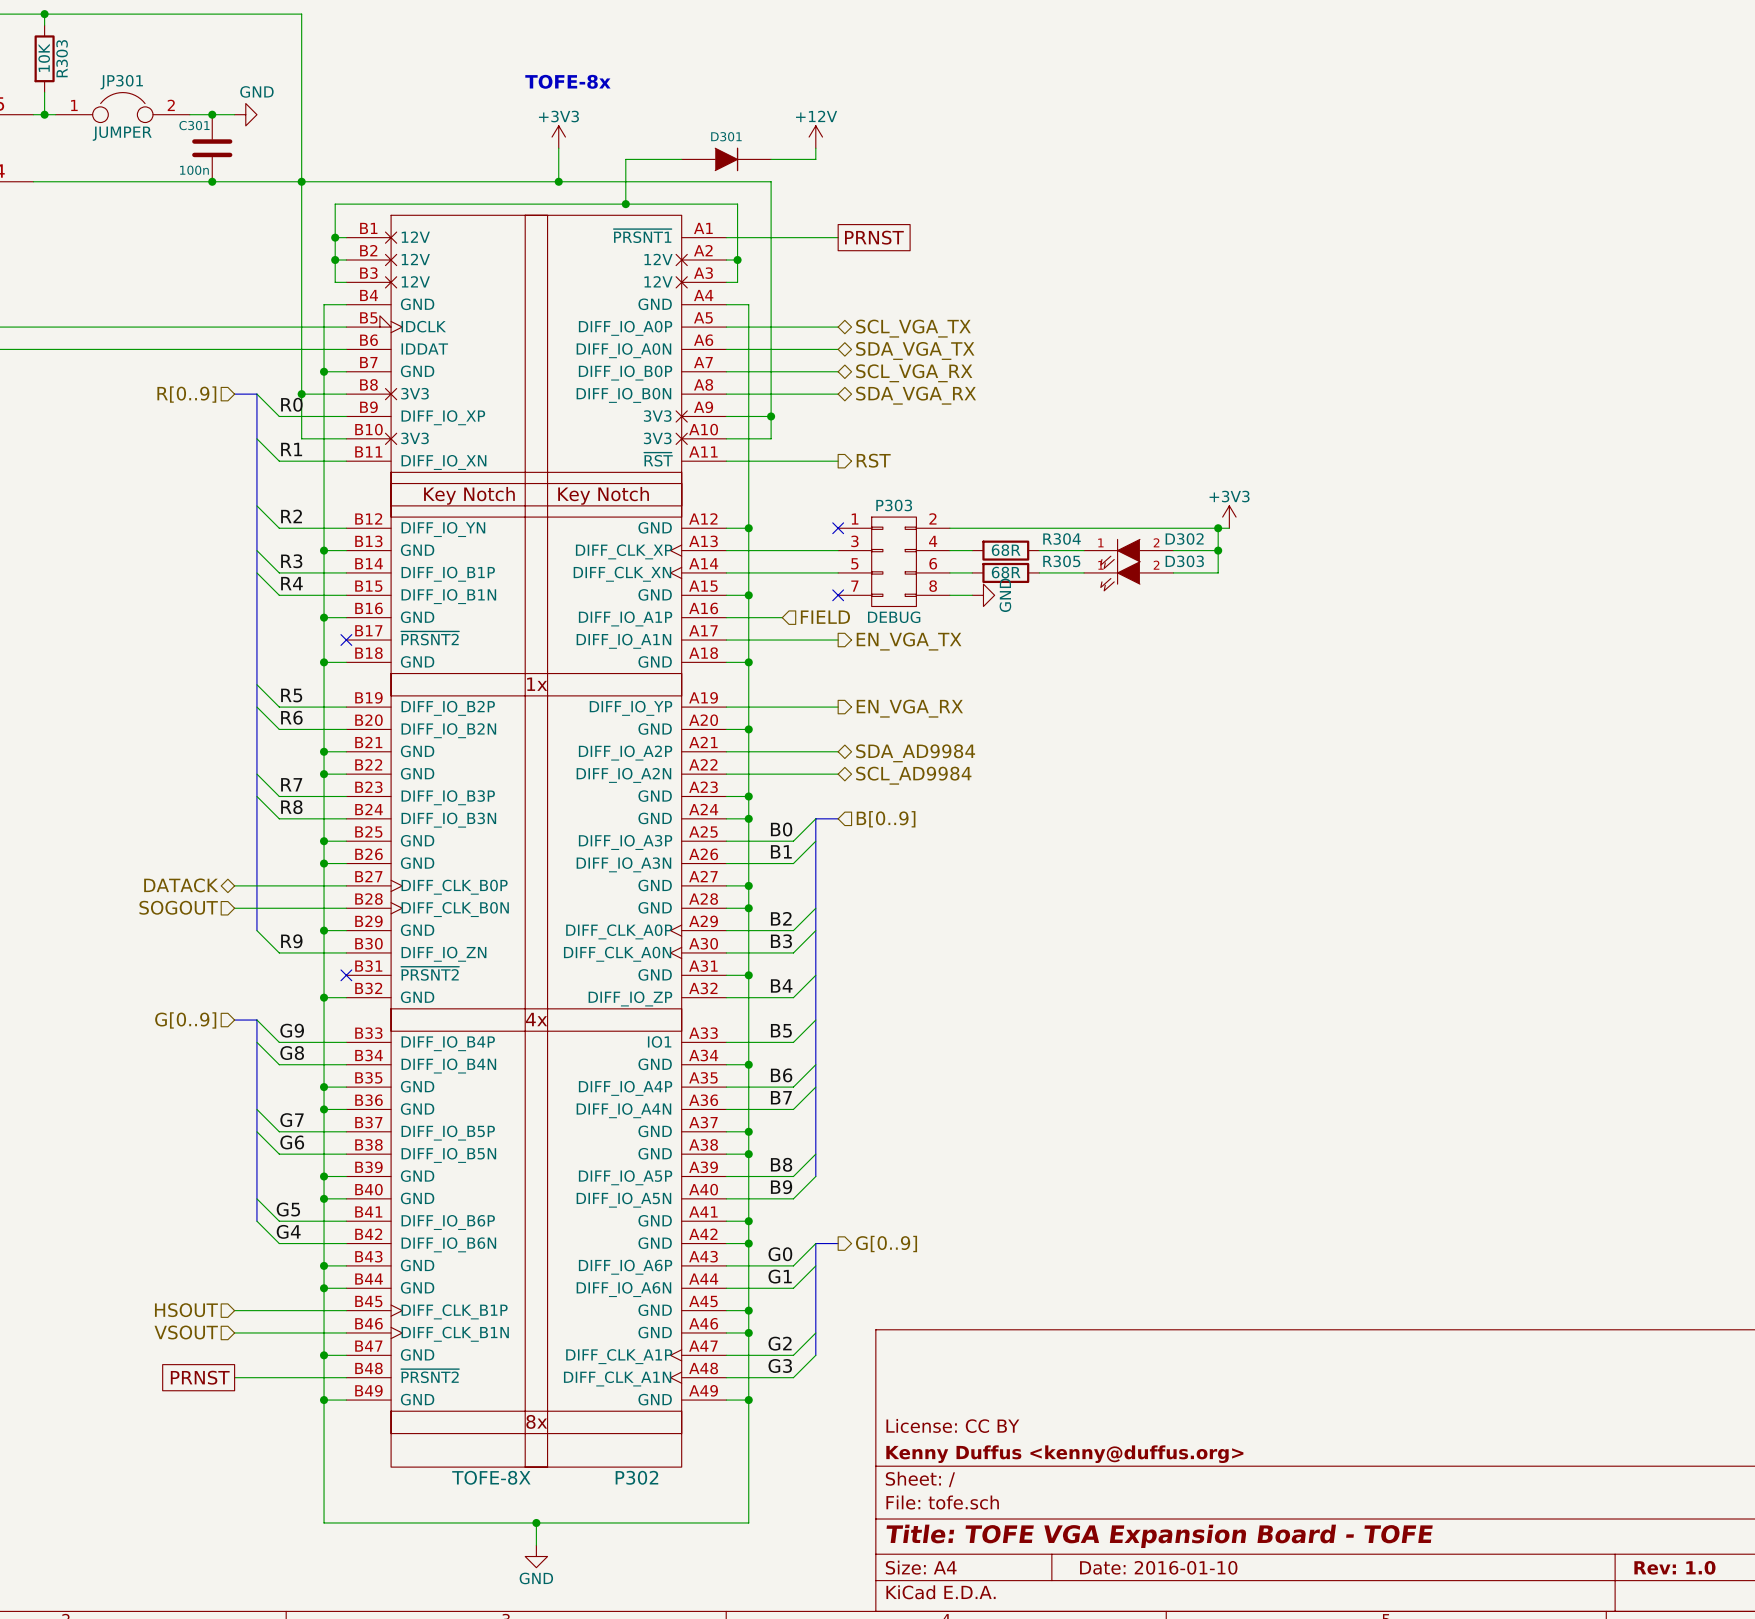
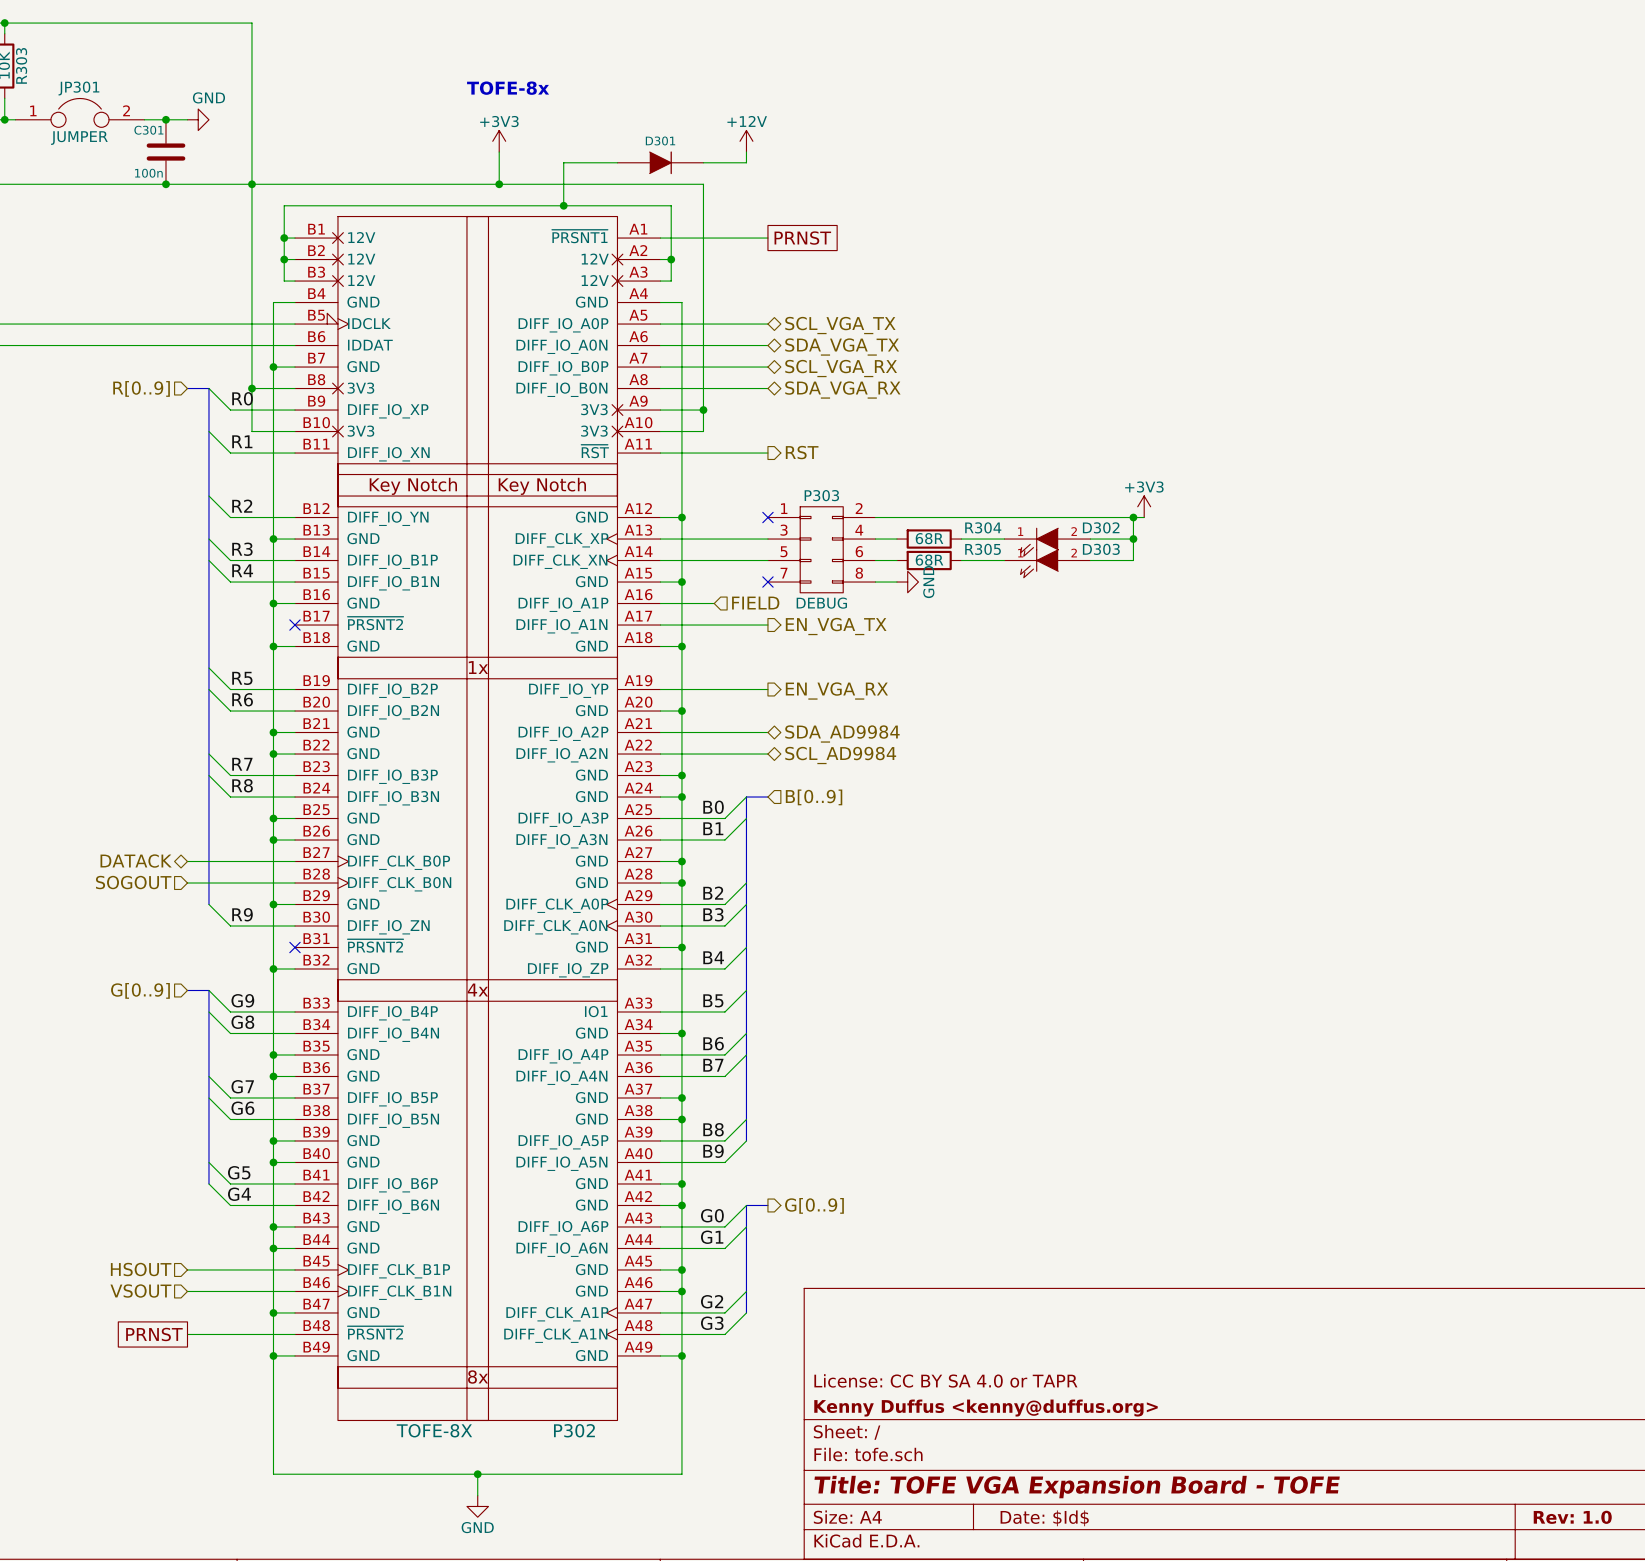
title block: License: CC BY (952, 1425) -> License: CC BY SA 4.0 or TAPR (945, 1380)
title block: Date: 2016-01-10 (1158, 1567) -> Date: $Id$ (1044, 1518)

